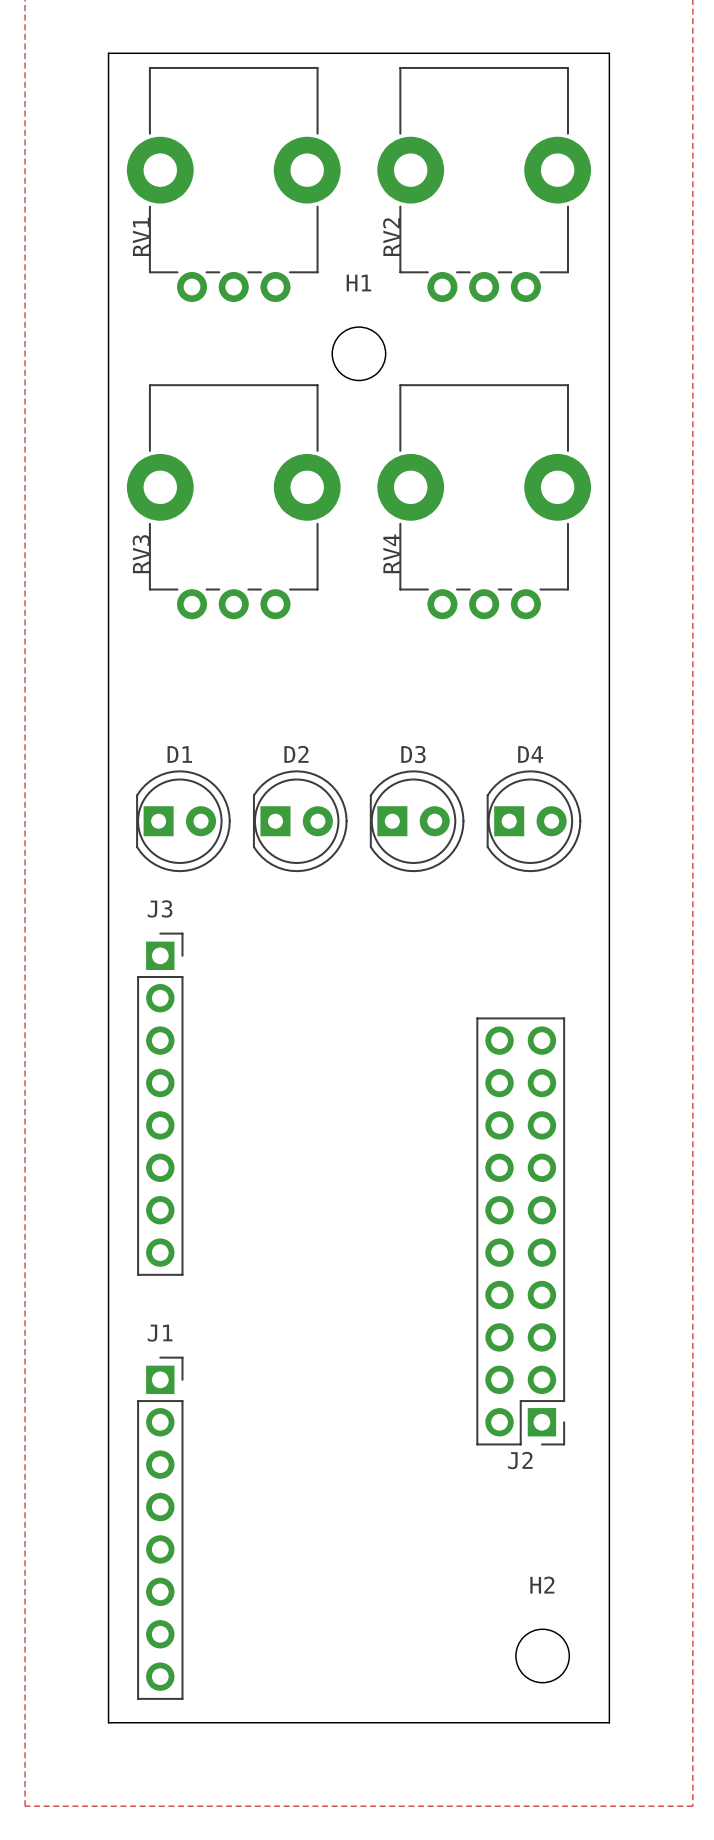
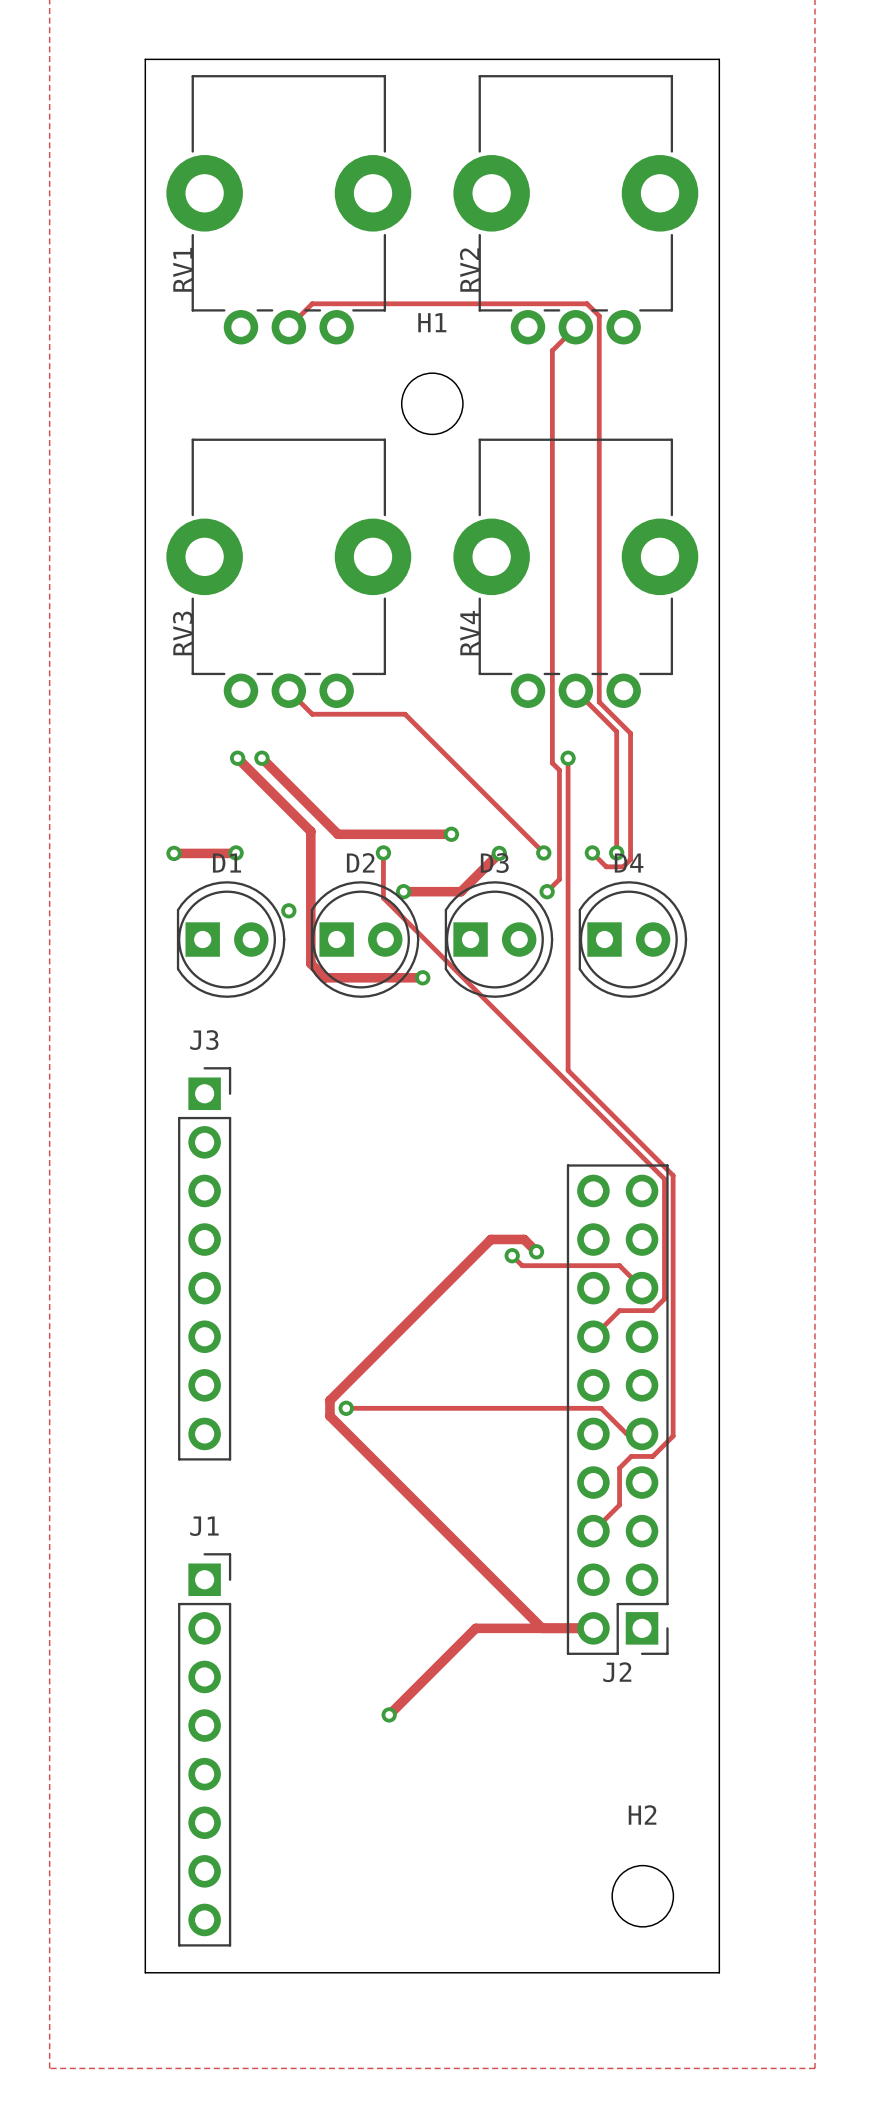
track: none -> (288, 327) (312, 303) (587, 303) (599, 315) (599, 702) (630, 733) (630, 859) (623, 866) (606, 866) (592, 852)
track: none -> (575, 327) (552, 350) (552, 763) (559, 770) (559, 879) (547, 891)
track: none -> (288, 690) (312, 714) (405, 714) (543, 852)
track: none -> (575, 690) (616, 731) (616, 852)
track: none -> (237, 758) (310, 831) (310, 963) (324, 977) (422, 977)
via: none -> (237, 758)
track: none -> (261, 758) (337, 834) (451, 834)
via: none -> (261, 758)
track: none -> (568, 758) (568, 1070) (673, 1175) (673, 1436) (652, 1456) (631, 1456) (619, 1468) (619, 1505) (593, 1531)
via: none -> (568, 758)
via: none -> (451, 834)
track: none -> (236, 852) (174, 853)
via: none -> (236, 852)
track: none -> (383, 852) (383, 898) (664, 1179) (664, 1298) (652, 1310) (619, 1310) (593, 1336)
via: none -> (383, 852)
via: none -> (543, 852)
via: none -> (592, 852)
via: none -> (616, 852)
via: none -> (174, 853)
track: none -> (499, 853) (461, 891) (403, 891)
via: none -> (499, 853)
via: none -> (403, 891)
via: none -> (547, 891)
via: none -> (288, 910)
via: none -> (422, 977)
track: none -> (536, 1251) (524, 1239) (491, 1239) (329, 1400) (329, 1416) (542, 1628)
via: none -> (536, 1251)
track: none -> (512, 1255) (522, 1265) (619, 1265) (642, 1288)
via: none -> (512, 1255)
track: none -> (346, 1408) (601, 1408) (626, 1433) (642, 1433)
via: none -> (346, 1408)
track: none -> (593, 1628) (475, 1628) (389, 1714)
via: none -> (389, 1714)

